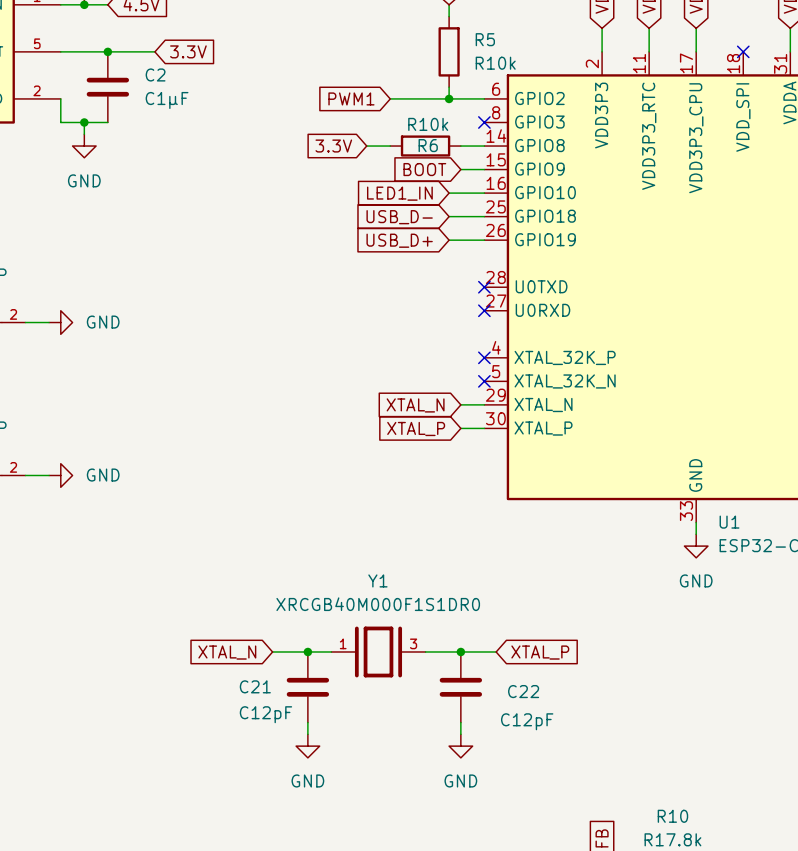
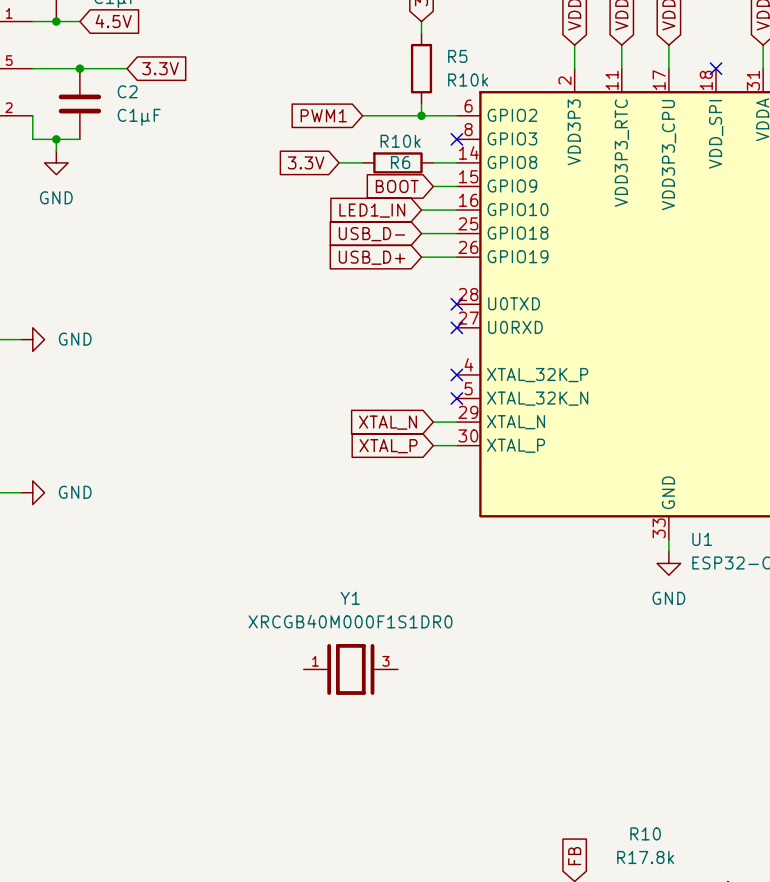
wire: (272, 651) (331, 651) -> none
junction: (307, 651) -> none
wire: (425, 651) (496, 651) -> none
junction: (460, 651) -> none
global label: XTAL_N (227, 652) -> none
global label: XTAL_P (540, 652) -> none
C21: C12pF (307, 687) -> none
C22: C12pF (460, 687) -> none
wire: (307, 722) (307, 734) -> none
wire: (460, 722) (460, 734) -> none
power symbol: GND (307, 746) -> none
power symbol: GND (460, 746) -> none

